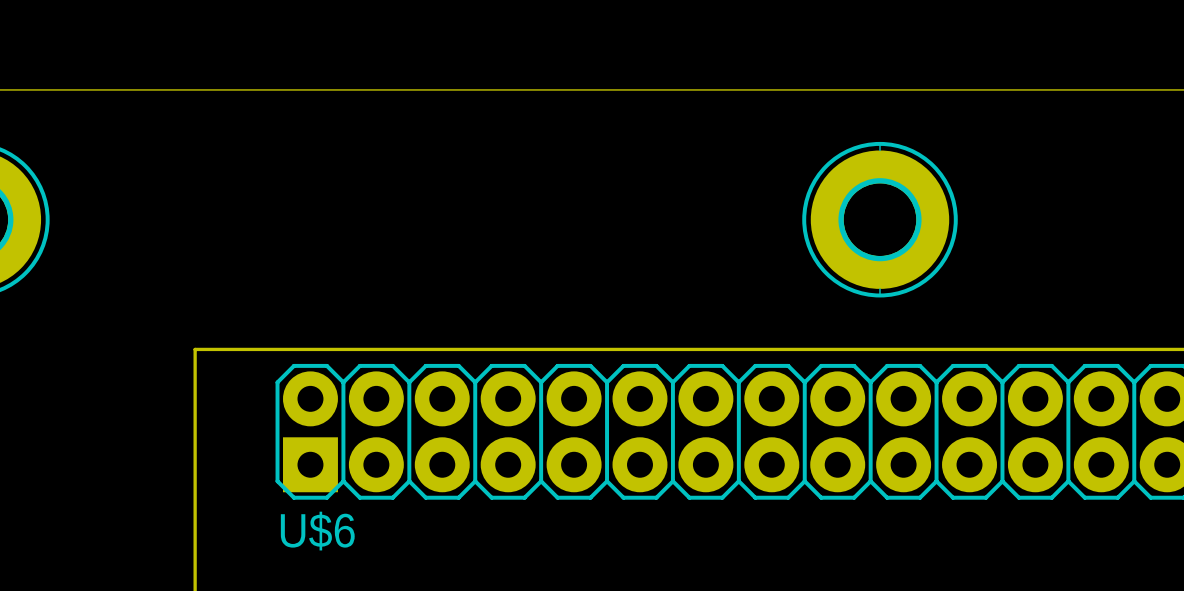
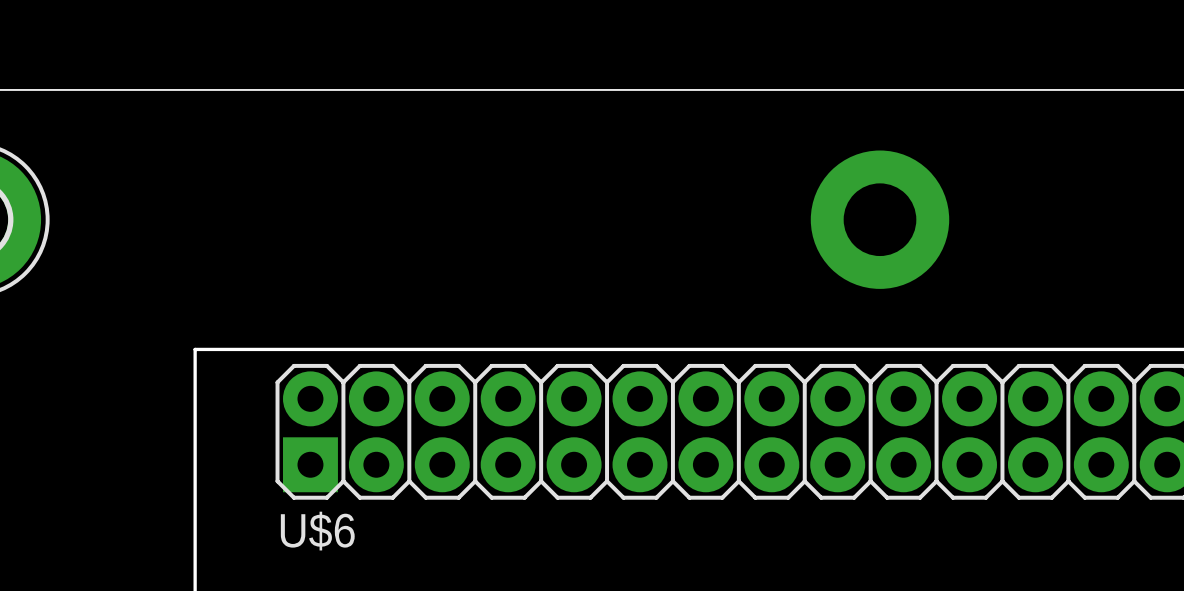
part side: top (880, 219) -> bottom (880, 219)

